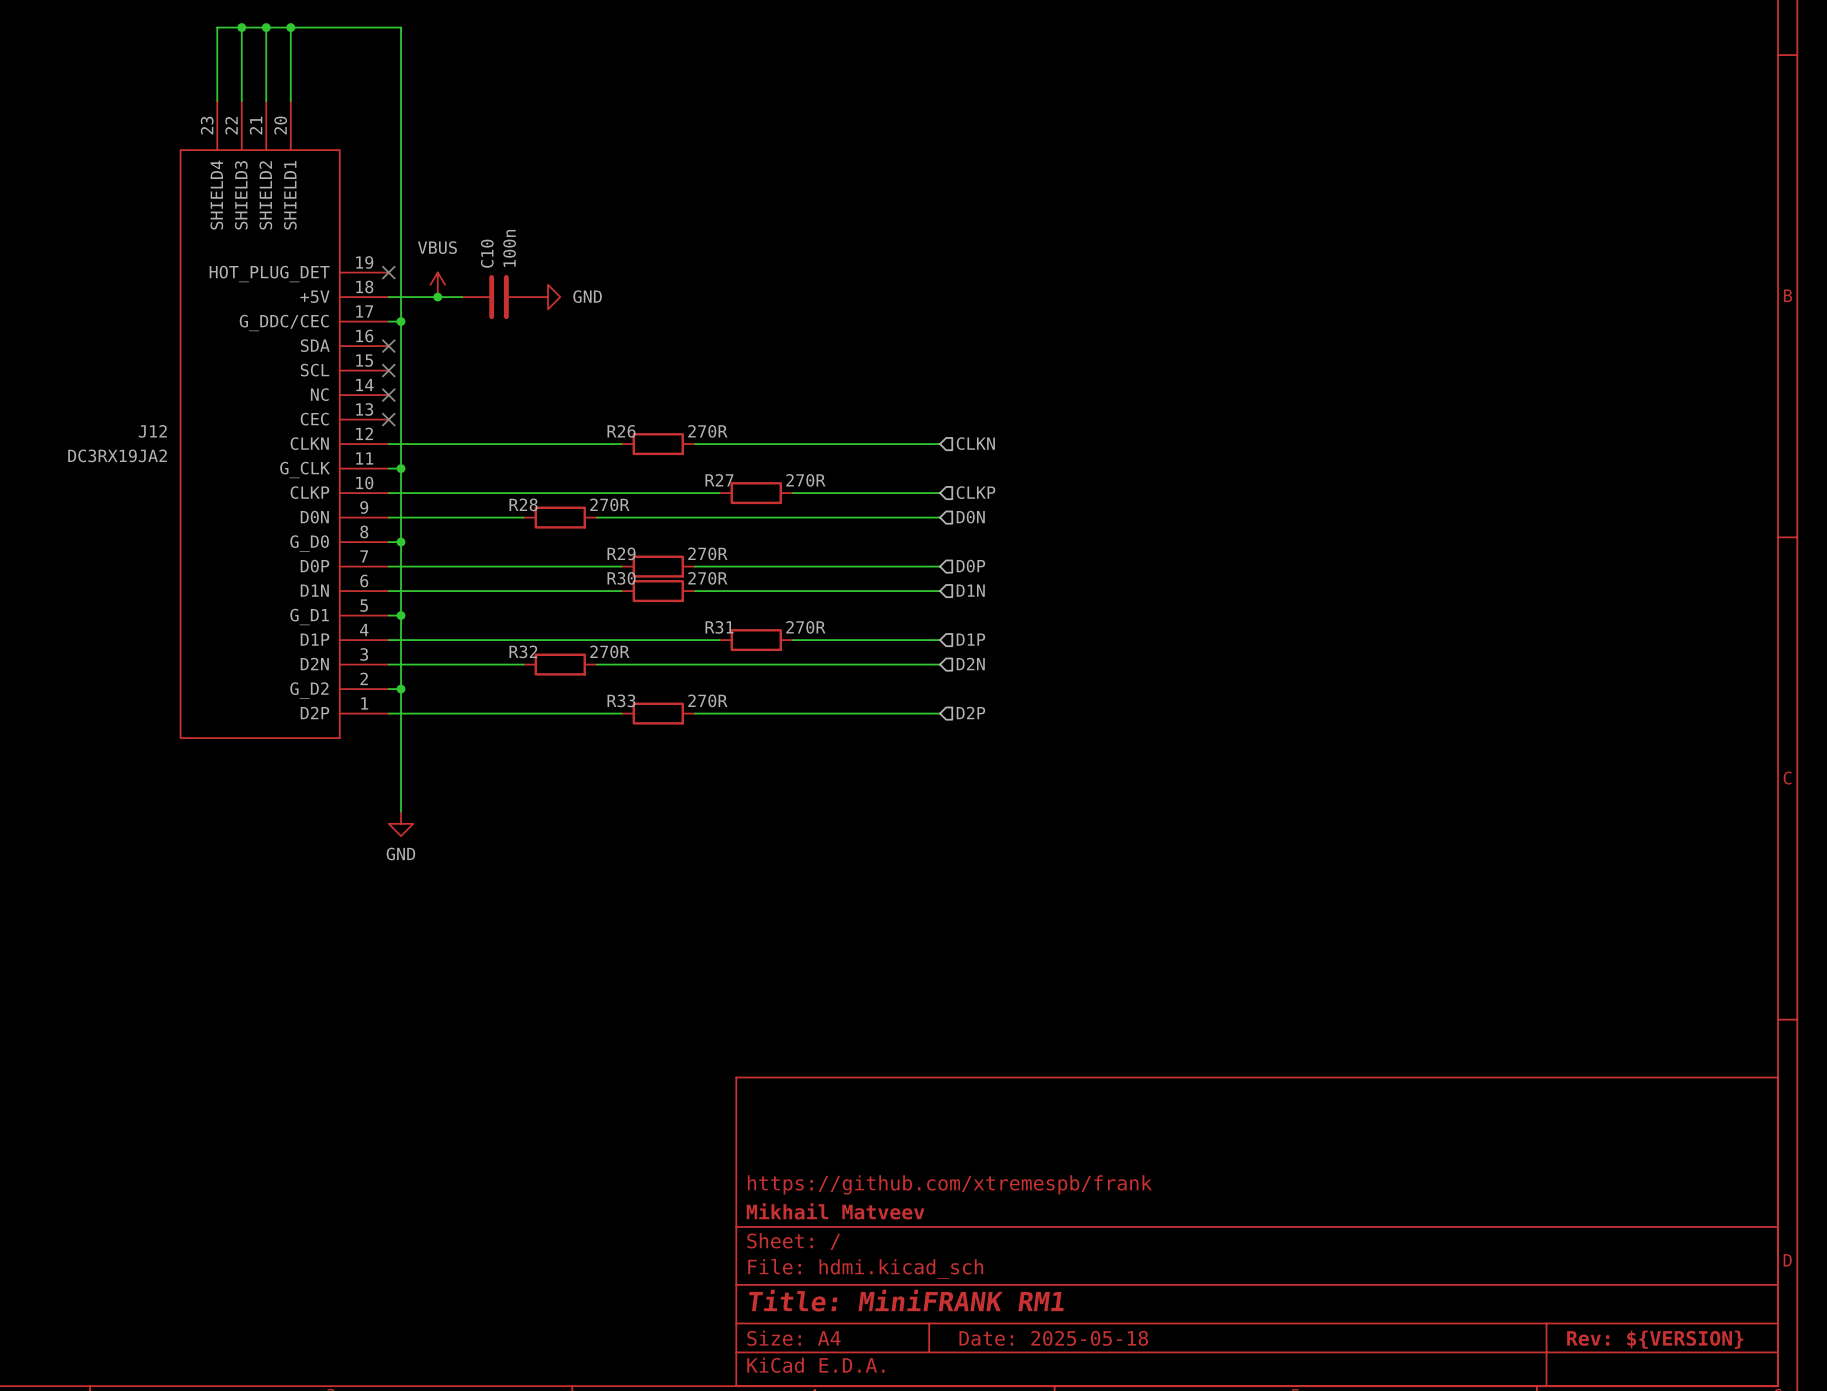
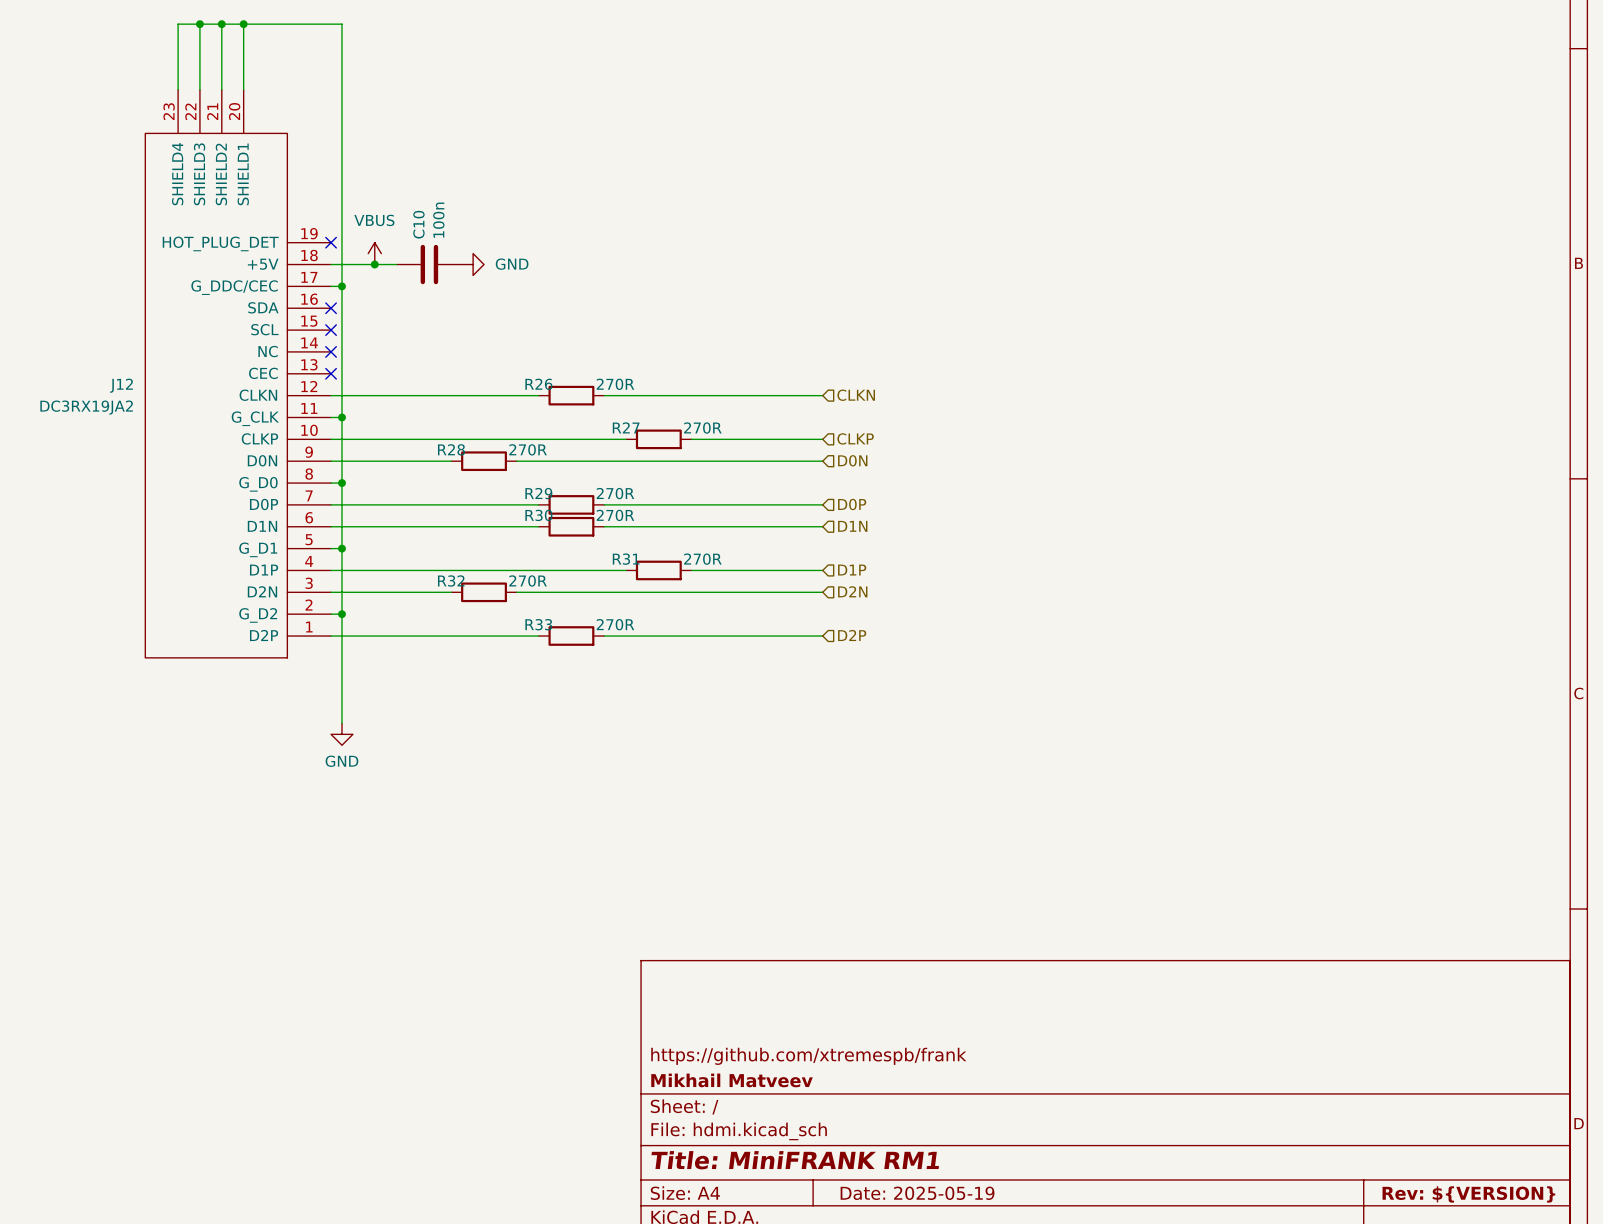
title block: Date: 2025-05-18 (1053, 1338) -> Date: 2025-05-19 (917, 1193)

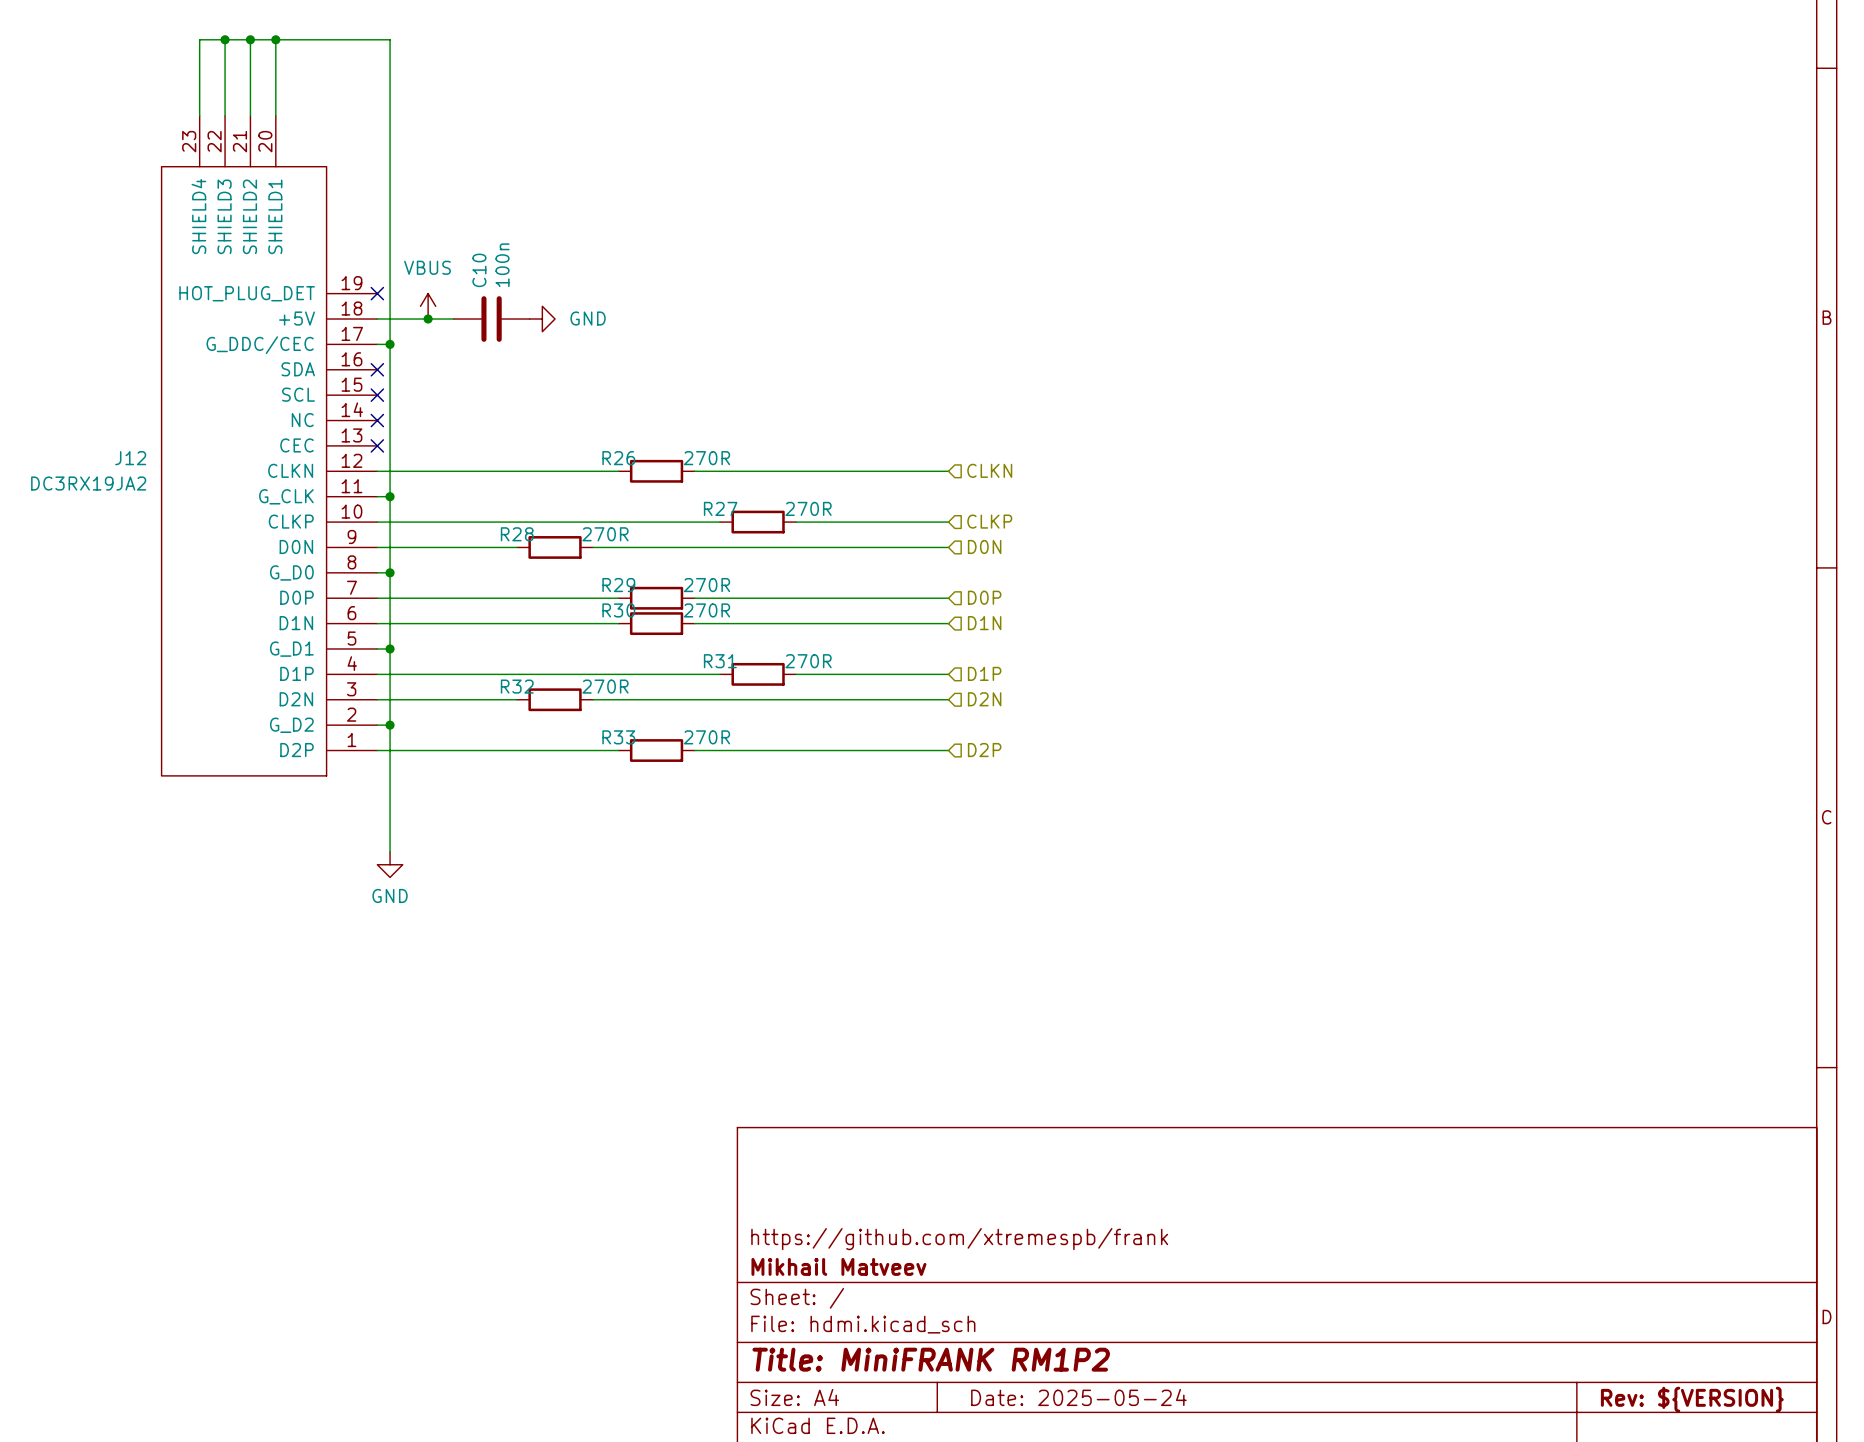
title block: Title: MiniFRANK RM1 (795, 1160) -> Title: MiniFRANK RM1P2 (931, 1359)
title block: Date: 2025-05-19 (917, 1193) -> Date: 2025-05-24 (1078, 1397)

